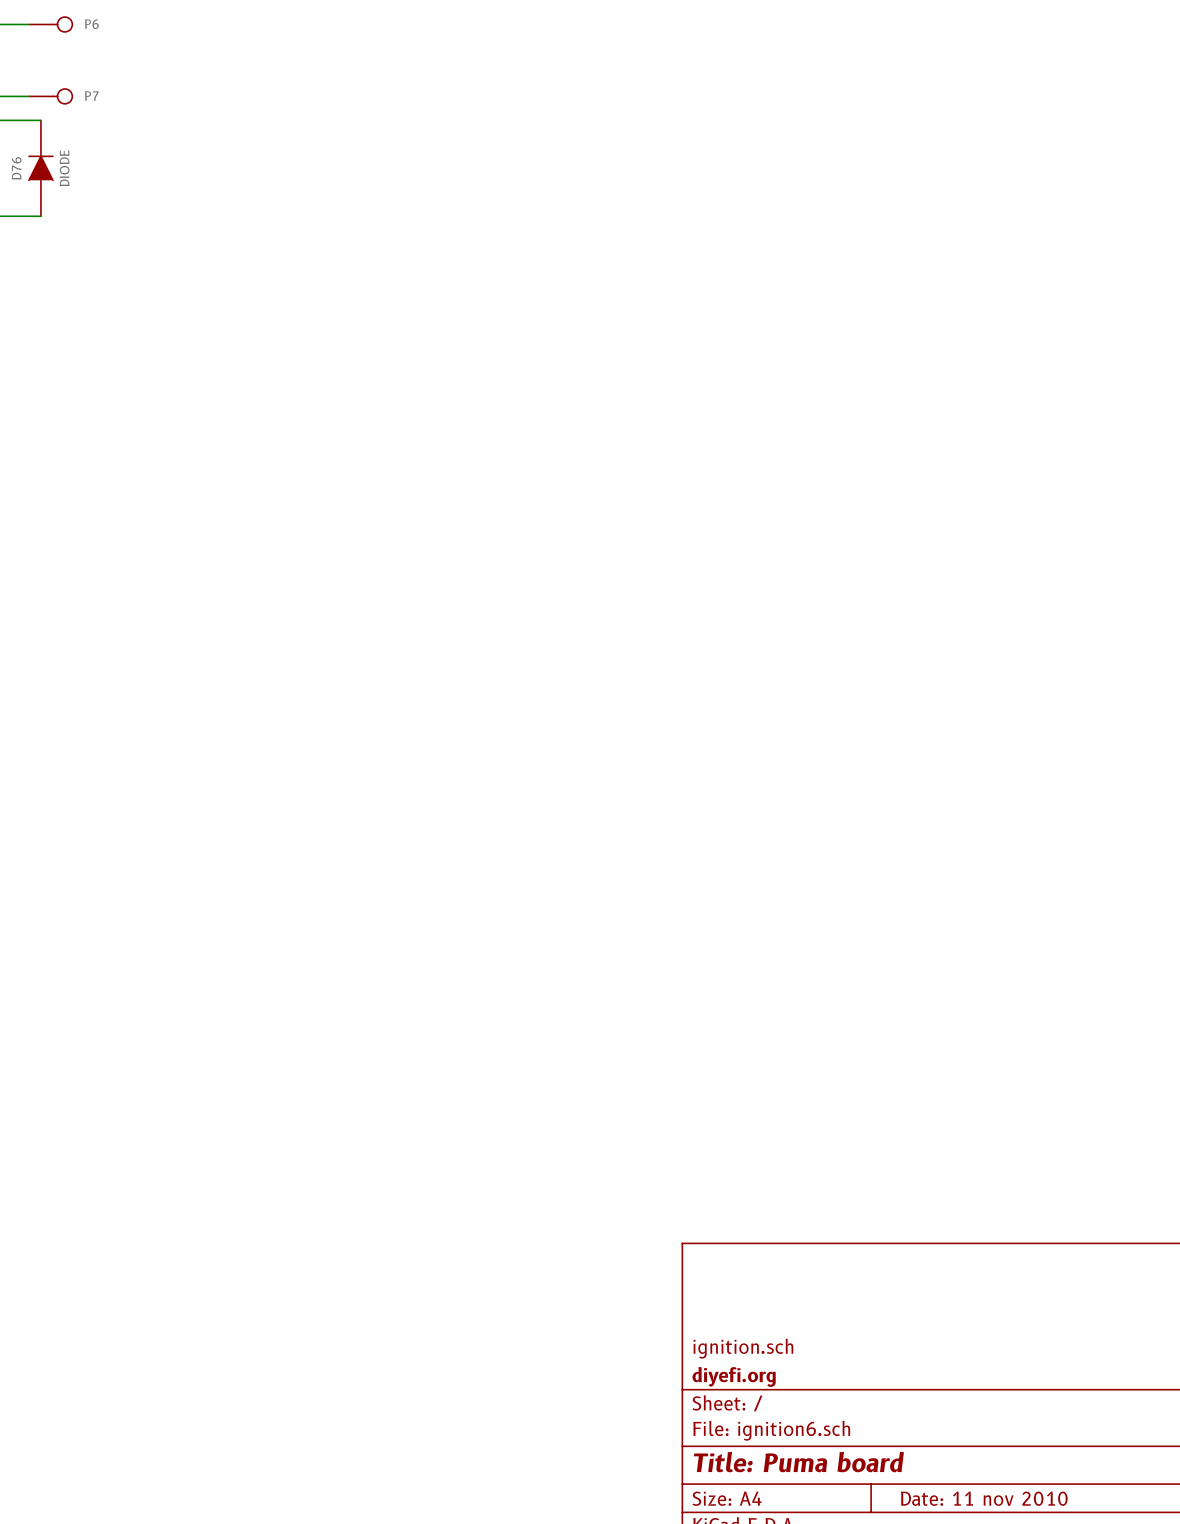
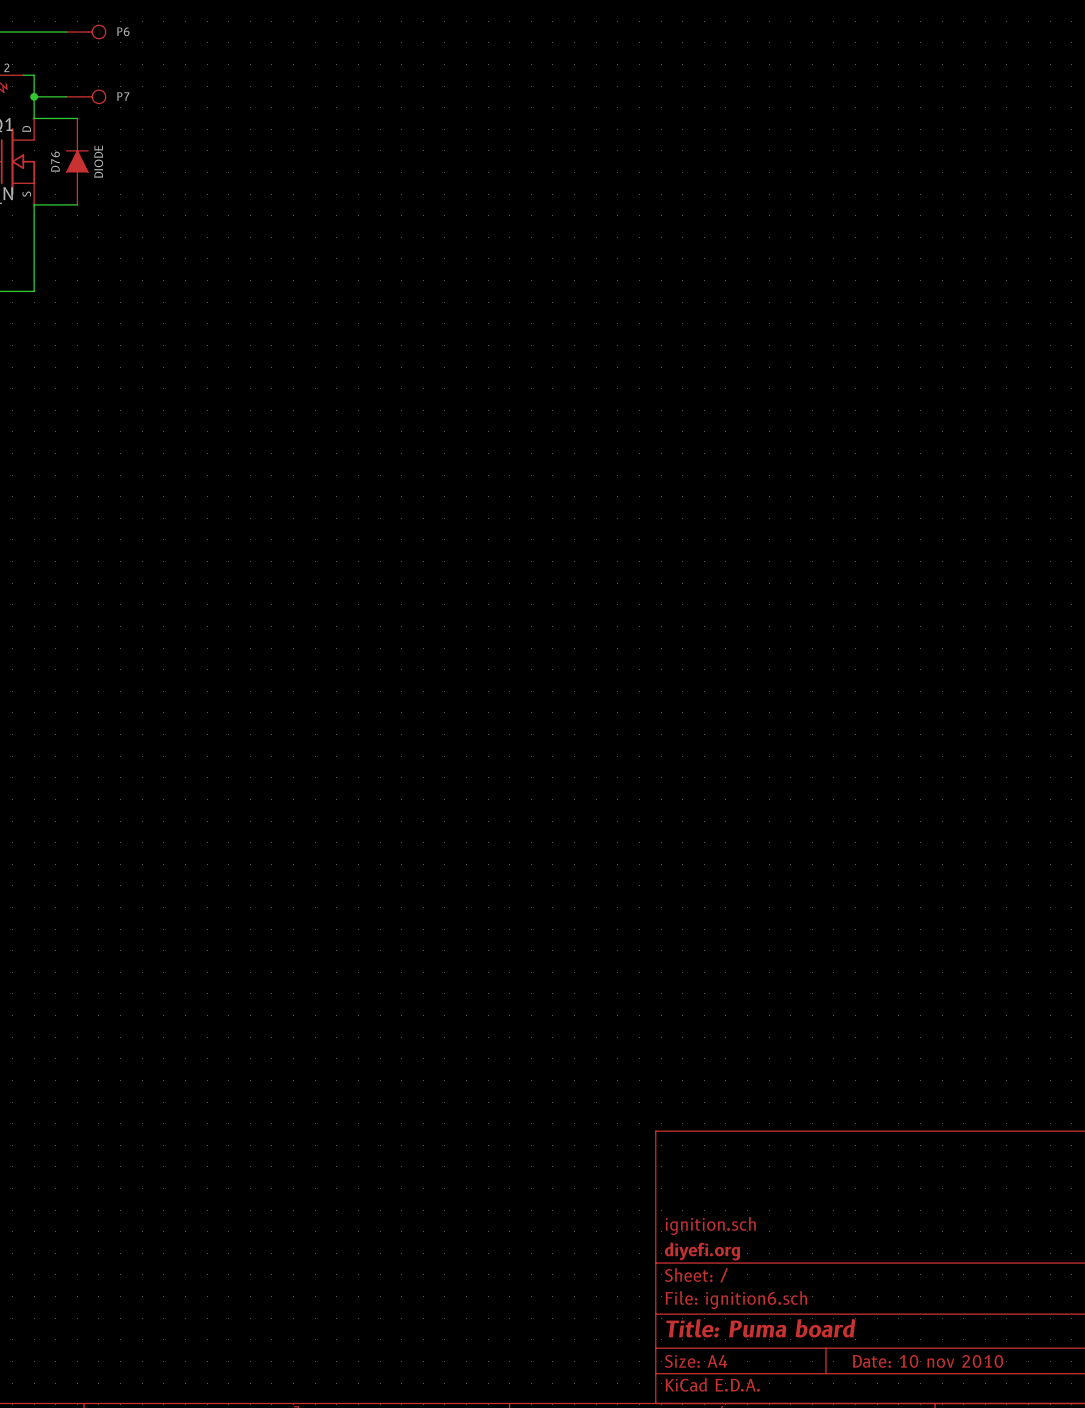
title block: Date: 11 nov 2010 (984, 1498) -> Date: 10 nov 2010 (928, 1361)

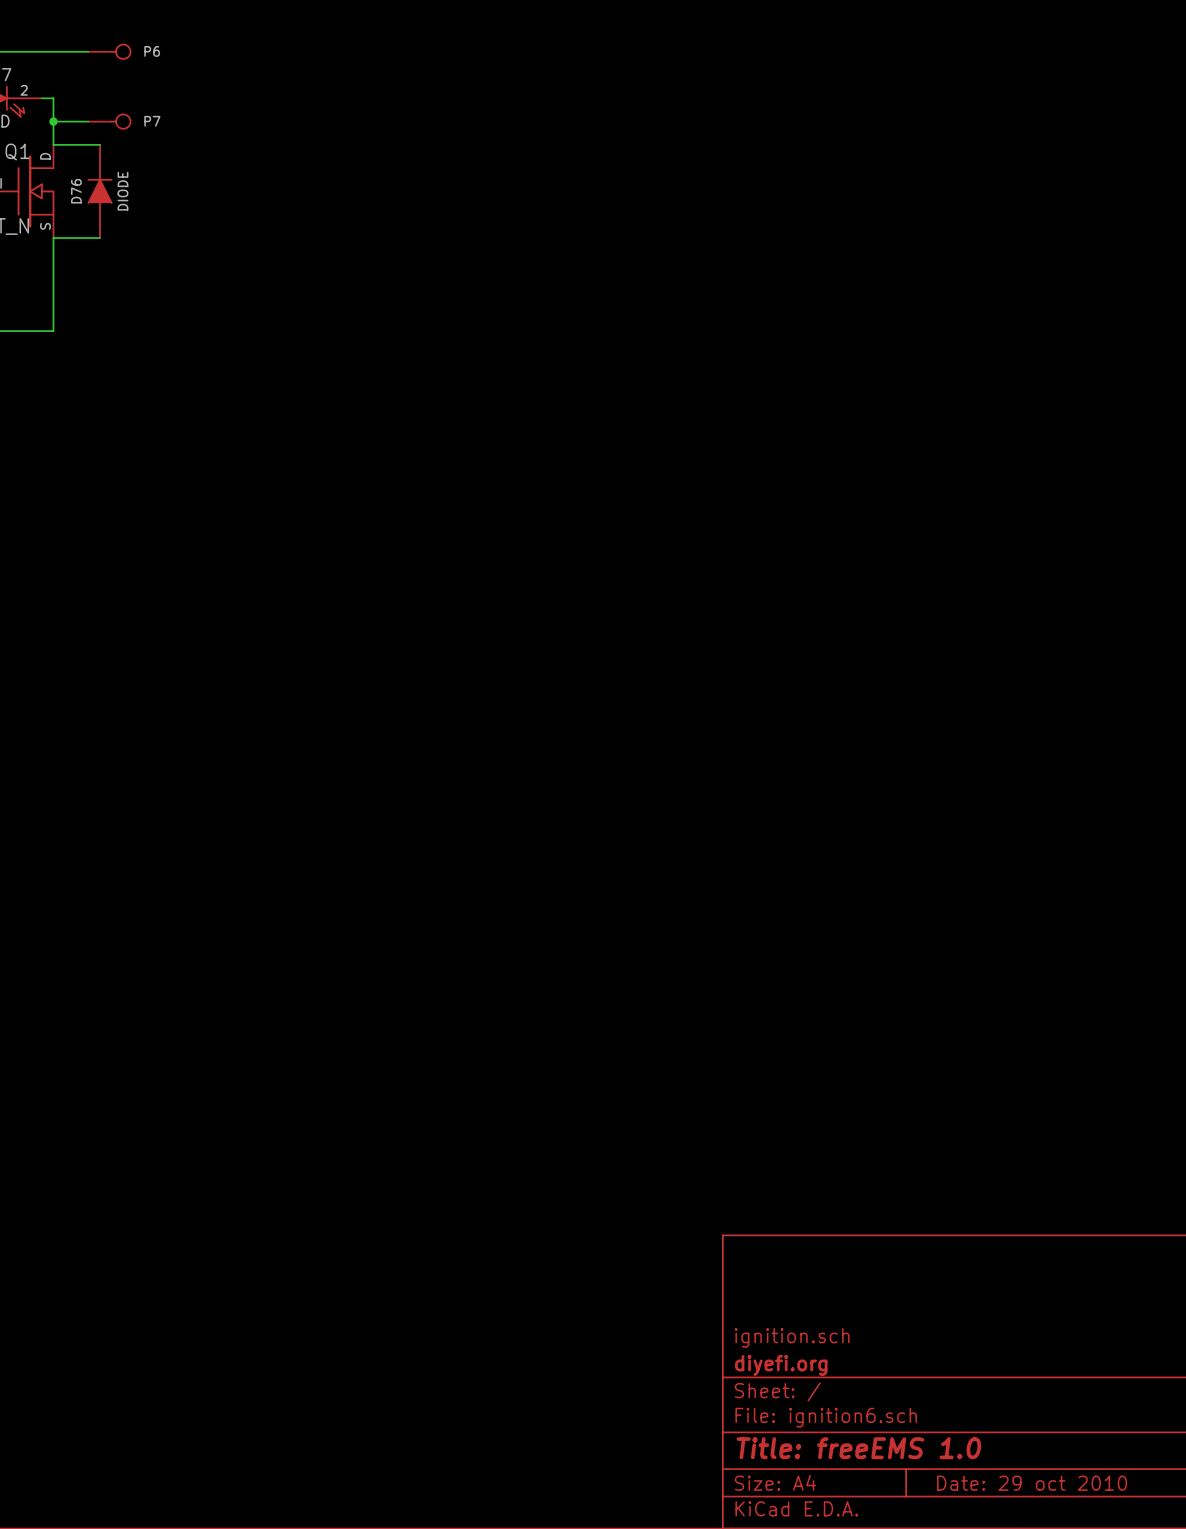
title block: Title: Puma board (760, 1328) -> Title: freeEMS 1.0 (858, 1448)
title block: Date: 10 nov 2010 (928, 1361) -> Date: 29 oct 2010 (1032, 1483)

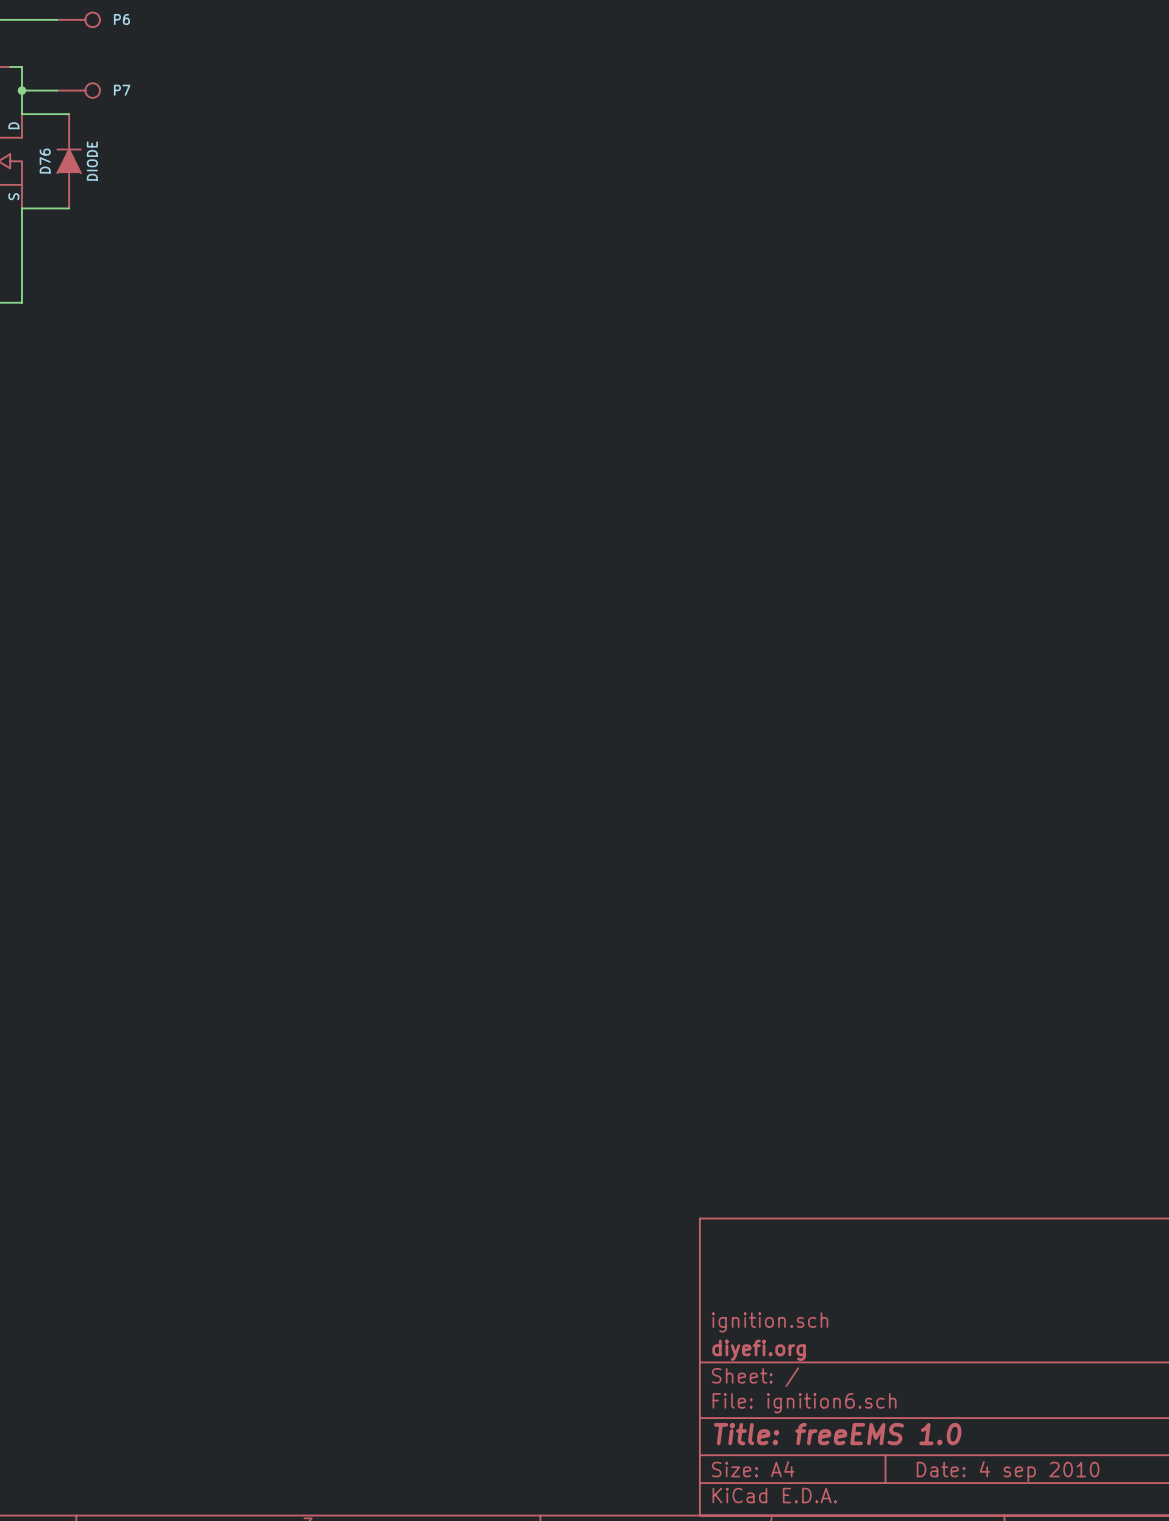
title block: Date: 29 oct 2010 (1032, 1483) -> Date: 4 sep 2010 (1008, 1471)

